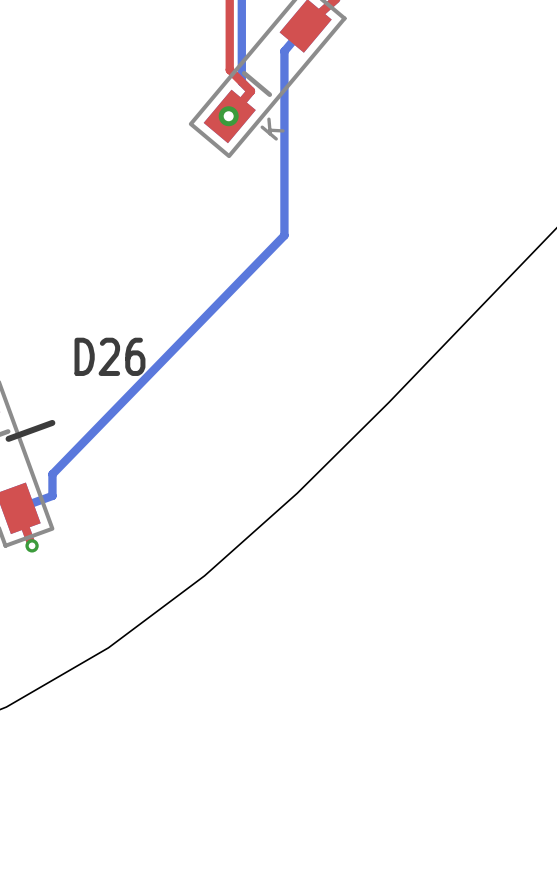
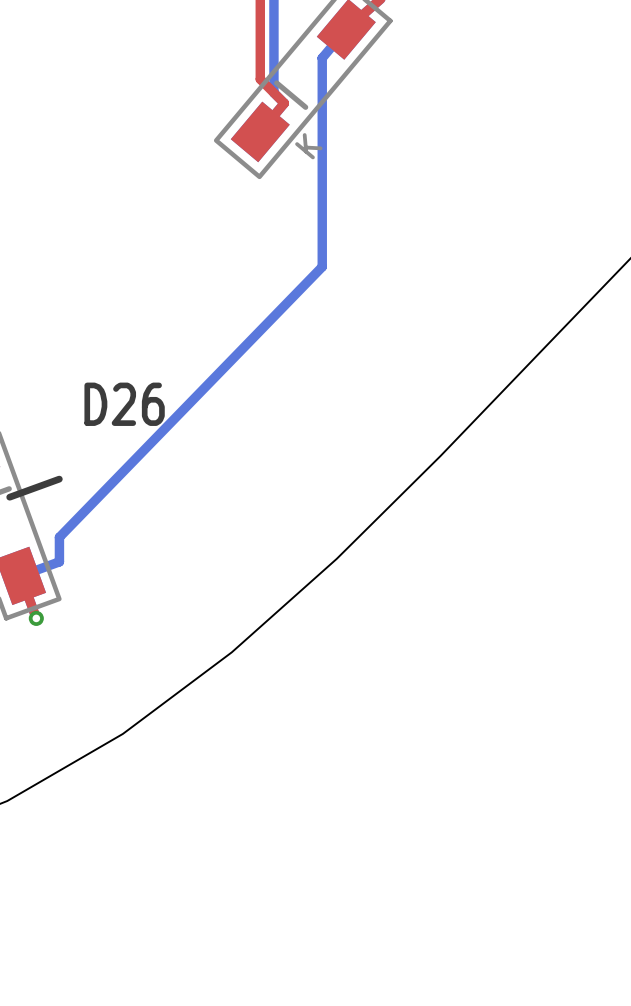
via: (228, 116) -> none

